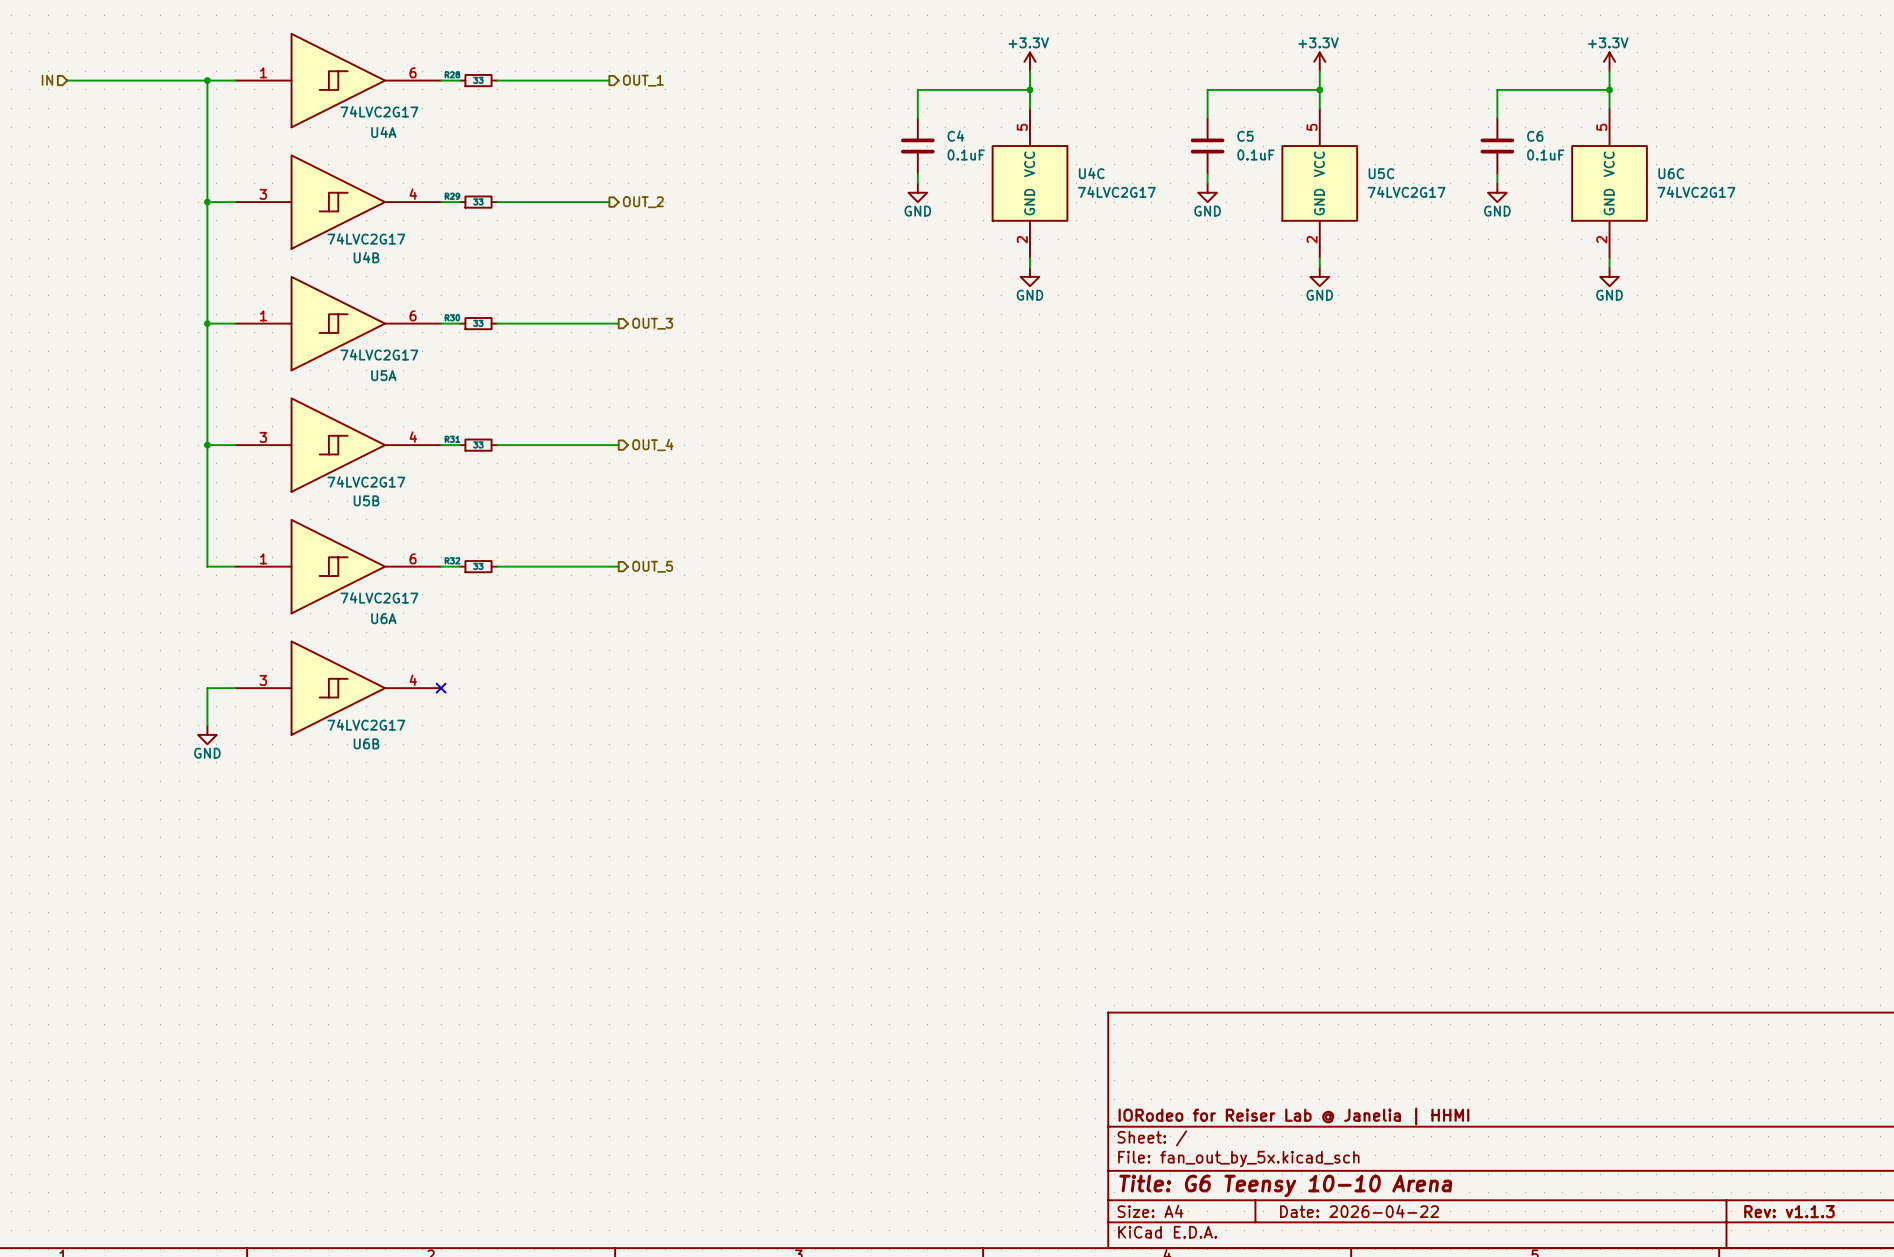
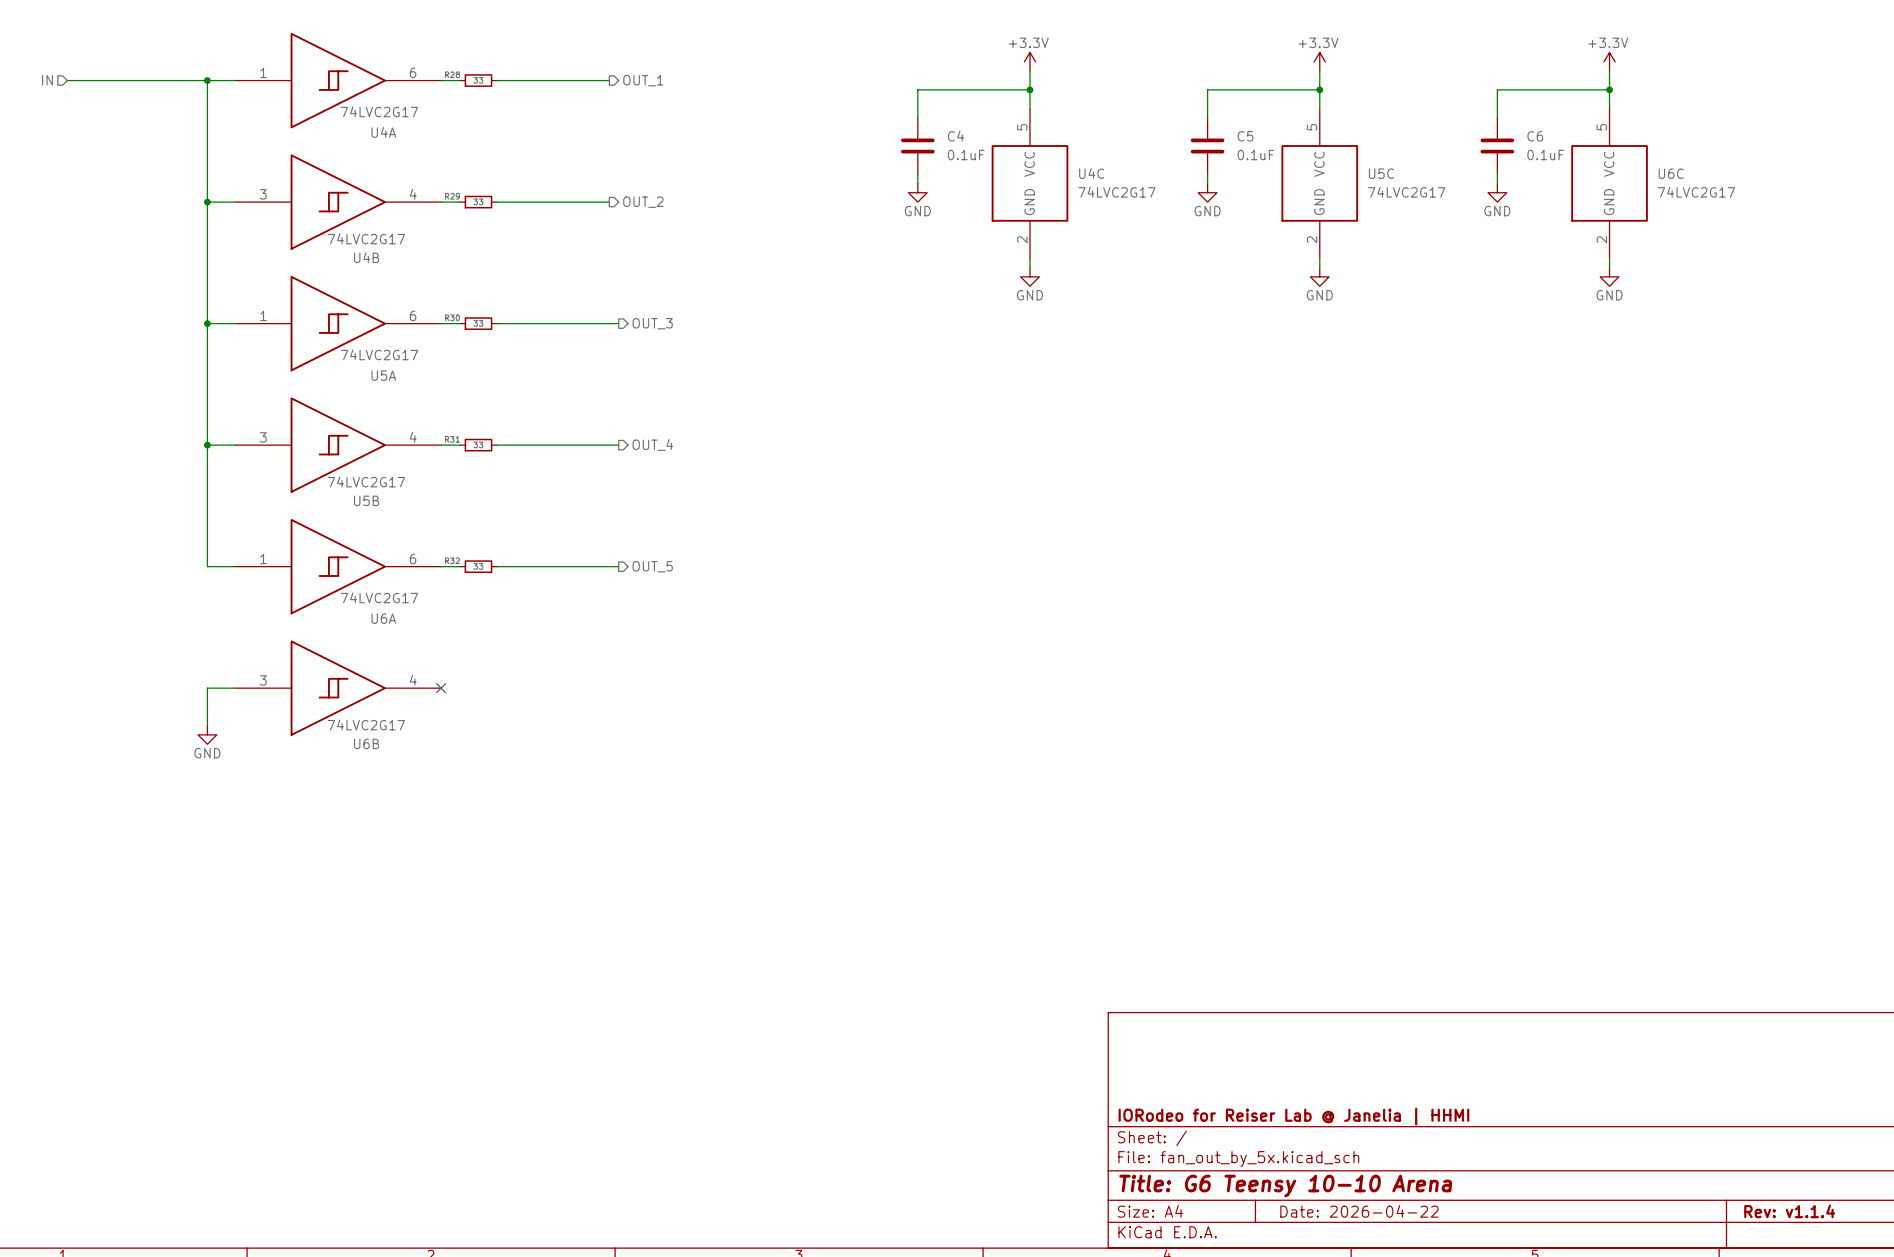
title block: Rev: v1.1.3 (1789, 1211) -> Rev: v1.1.4 (1789, 1211)

